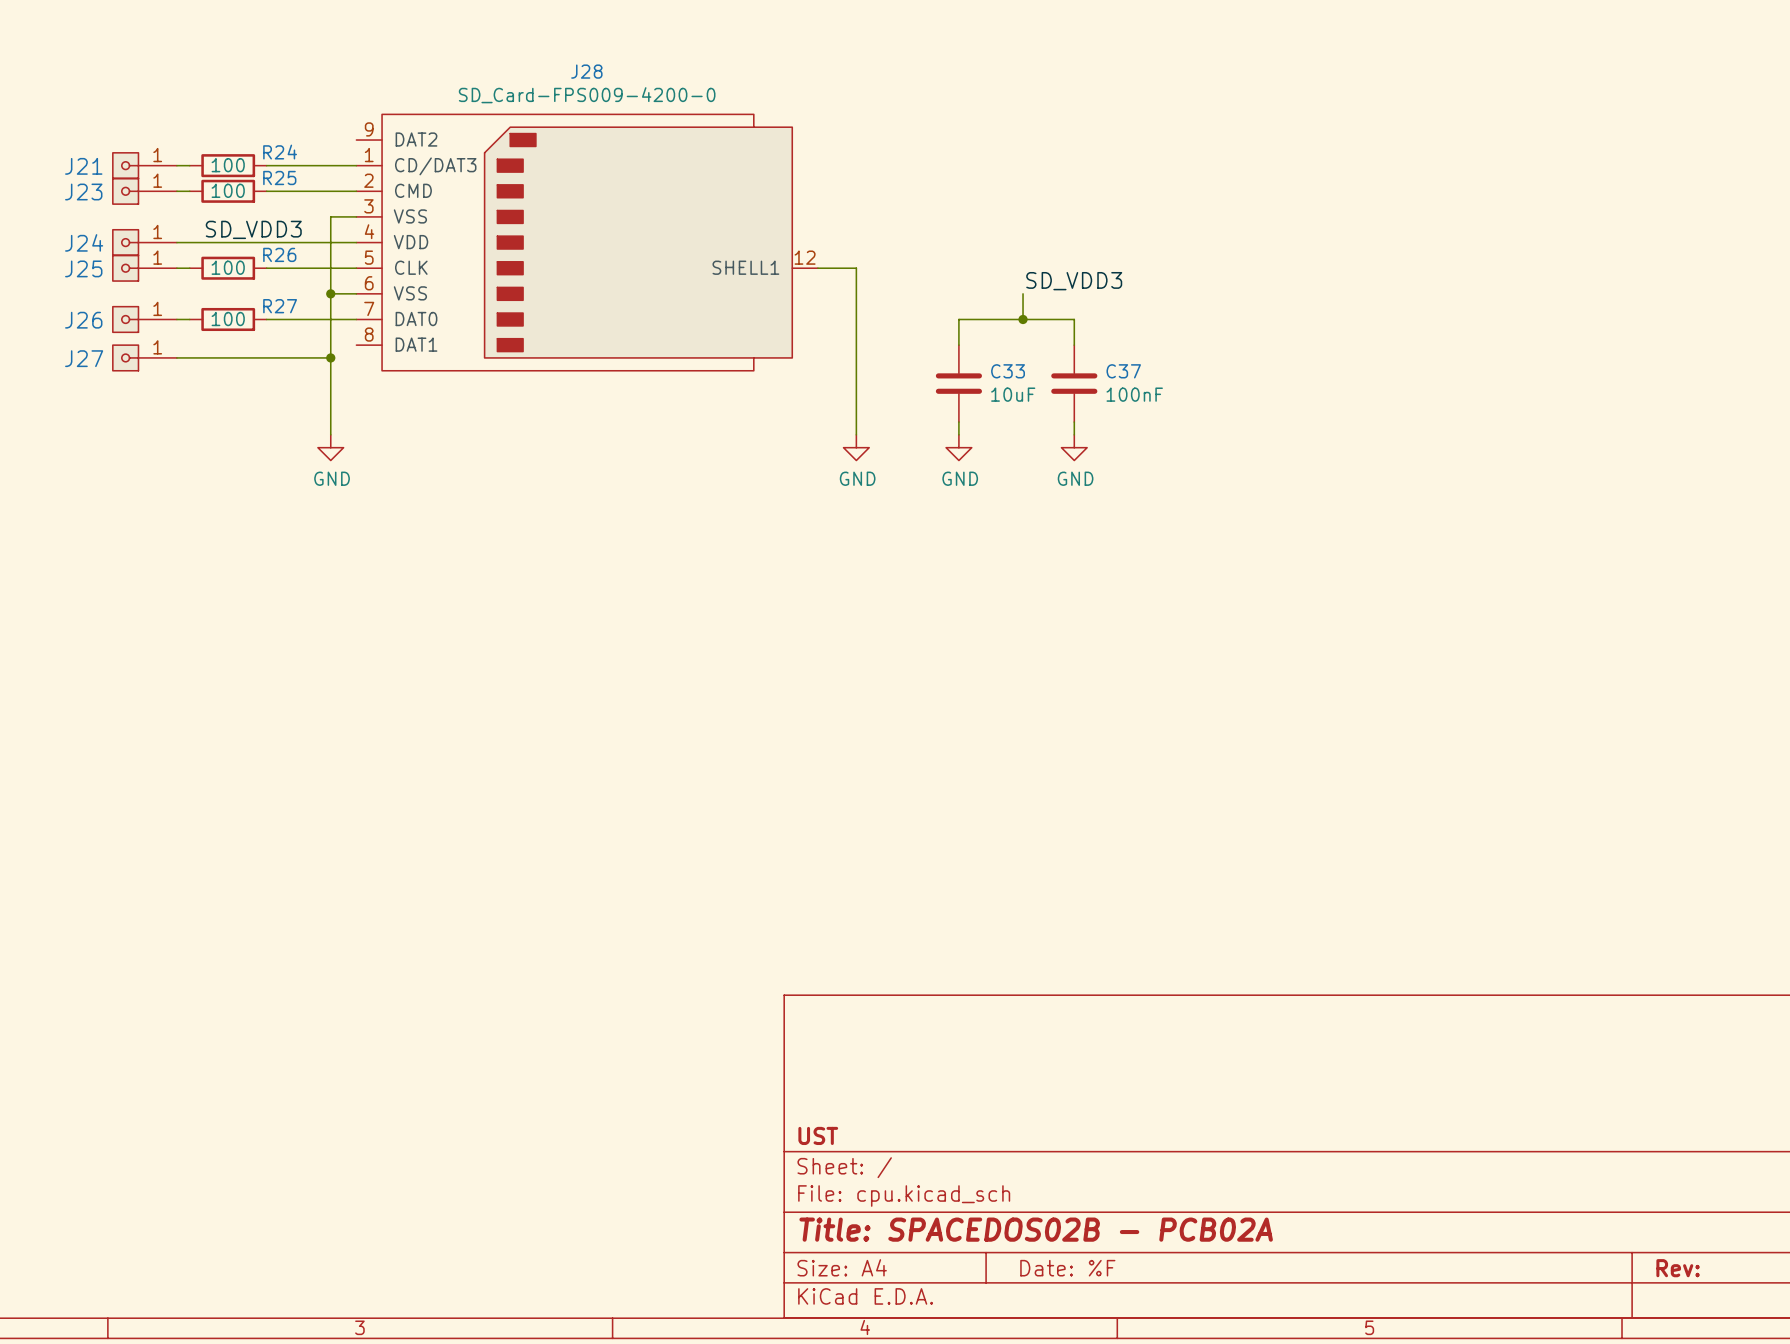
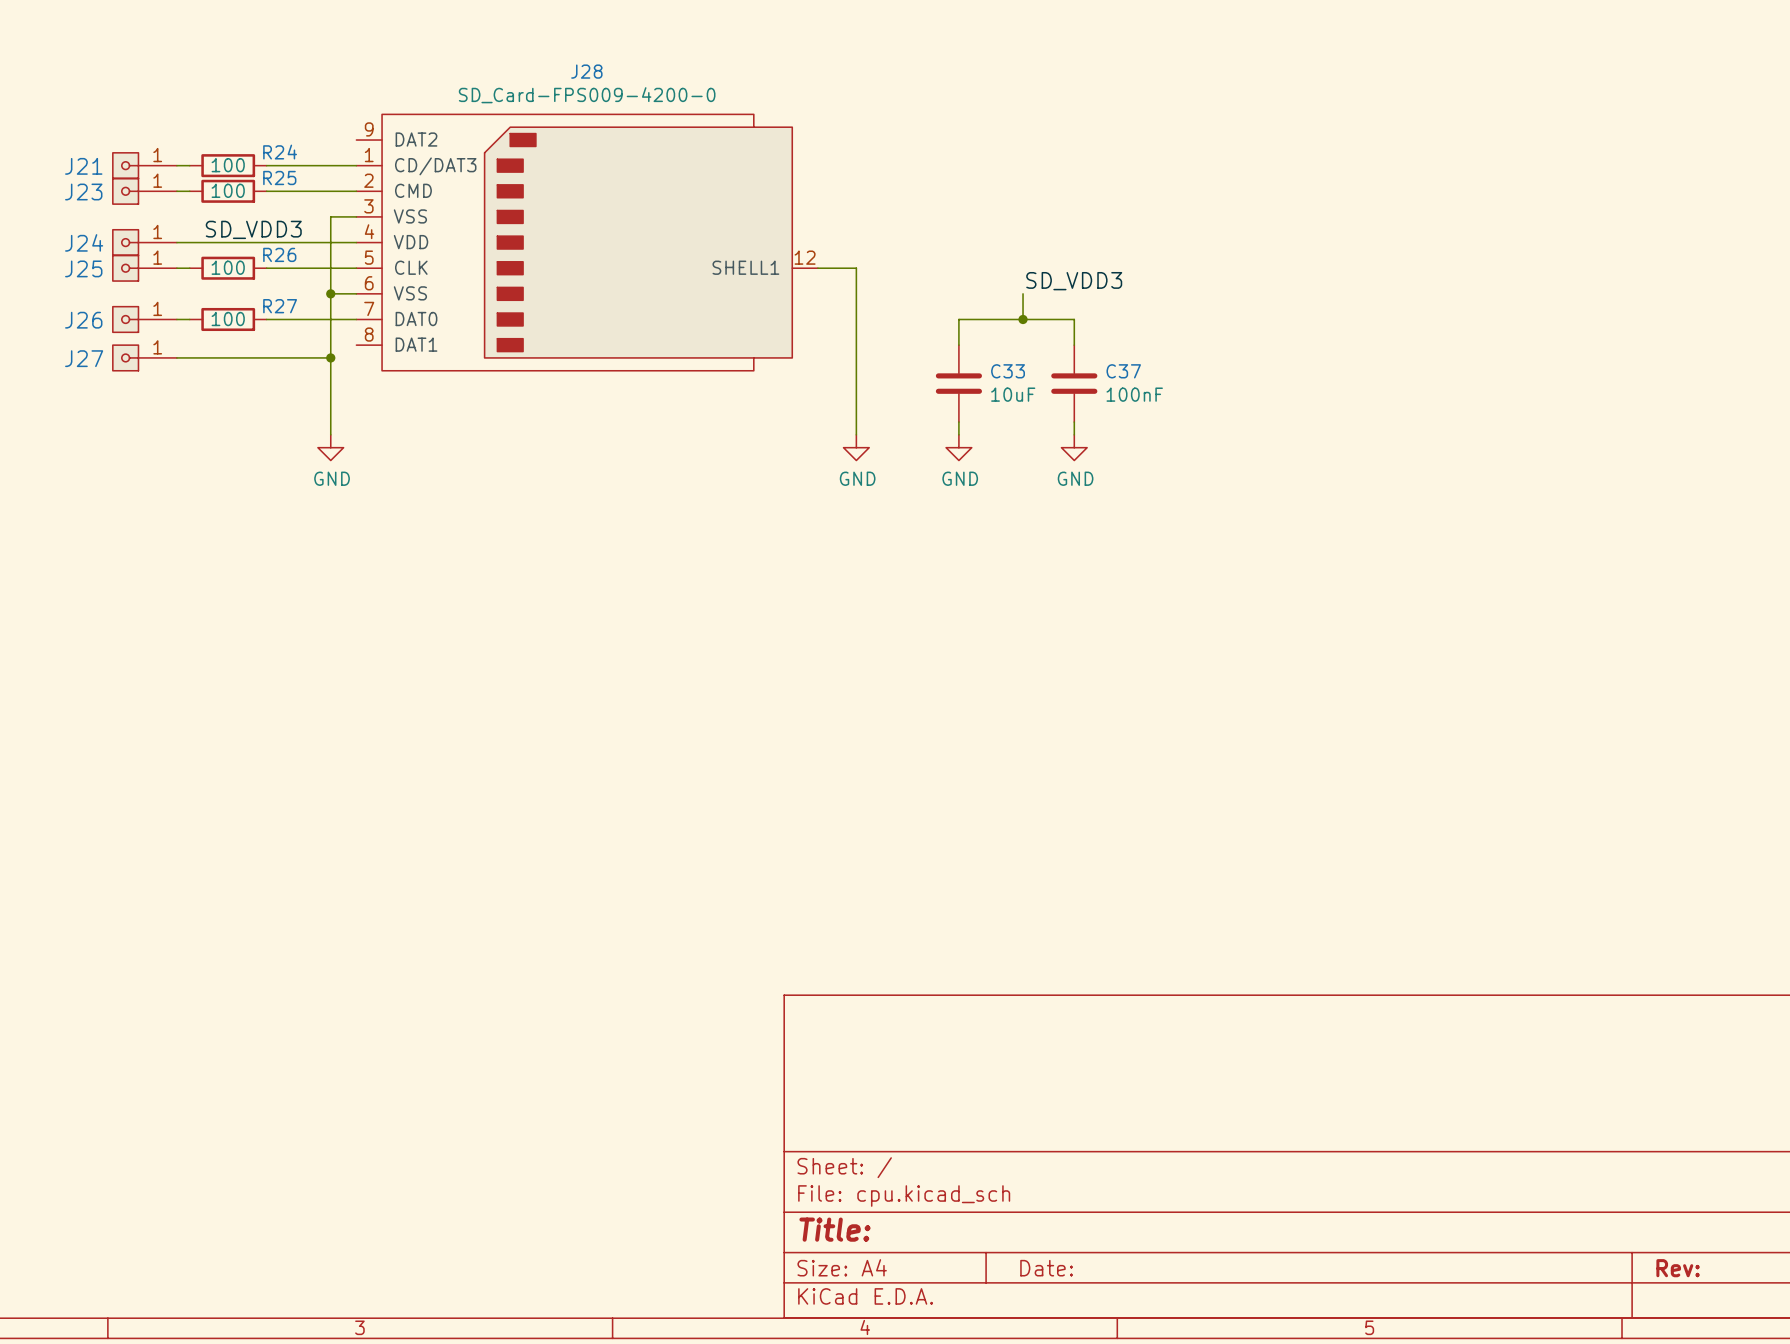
title block: UST (818, 1135) -> none
title block: Title: SPACEDOS02B - PCB02A (1036, 1229) -> Title: (834, 1229)
title block: Date: %F (1067, 1268) -> Date: (1046, 1268)

